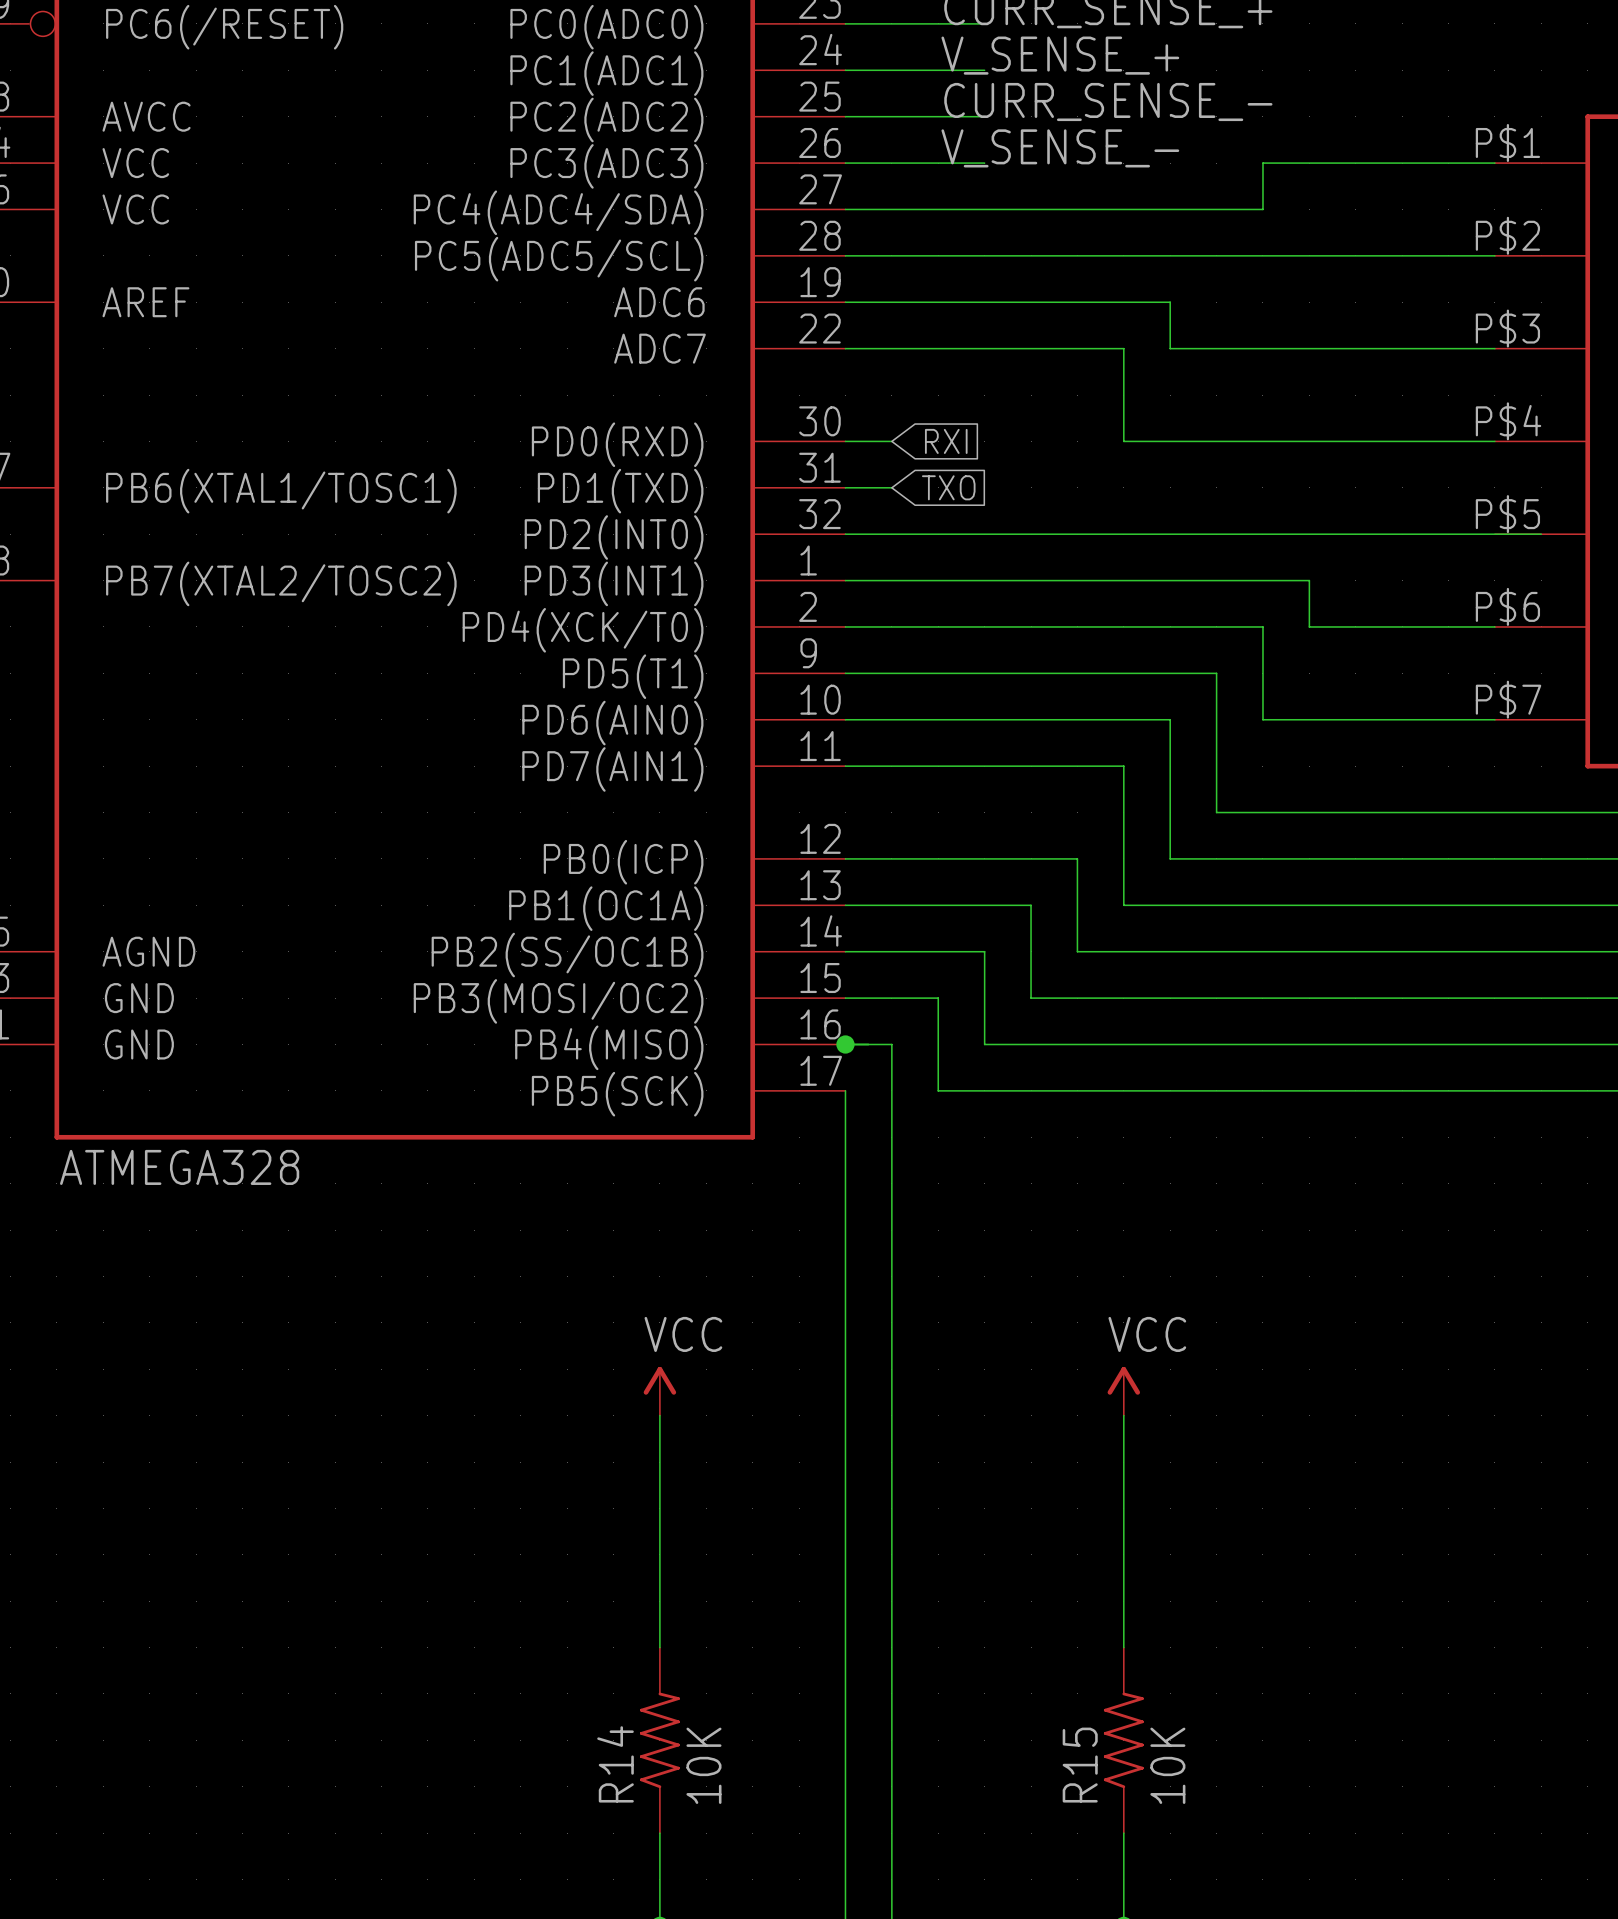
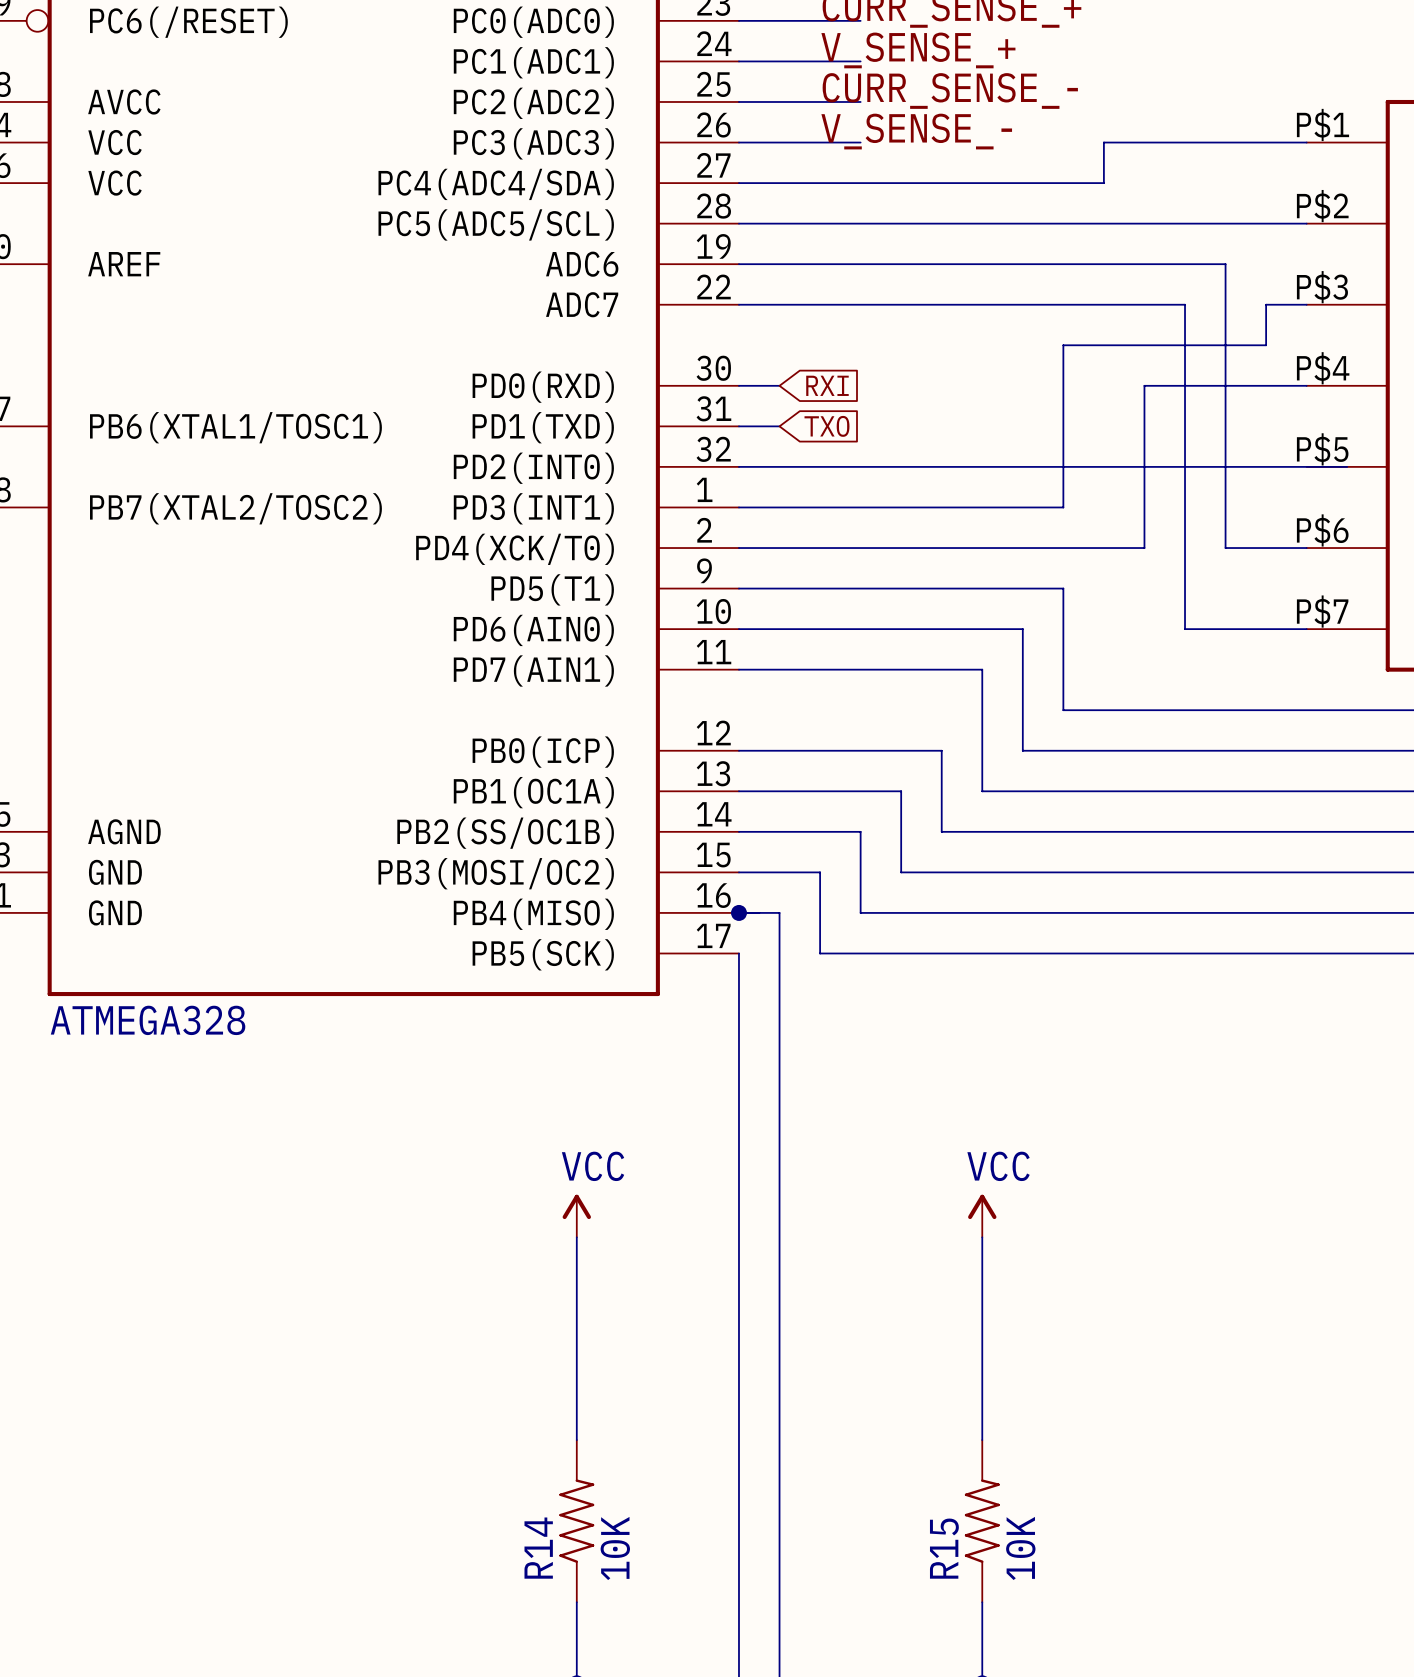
wire: (1170, 302) (1170, 348) -> (982, 304) (1022, 304)
wire: (1123, 348) (1123, 441) (1309, 441) -> none
wire: (1355, 348) (1448, 348) -> (1063, 507) (1063, 345) (1266, 345) (1266, 304)
wire: none -> (1185, 304) (1185, 629)
wire: (1216, 580) (1309, 580) -> (1144, 385) (1144, 507)
wire: (1262, 626) (1262, 719) (1355, 719) -> (1103, 548) (1144, 548)
wire: (1309, 626) (1402, 626) -> (1022, 264) (1225, 264) (1225, 548)

